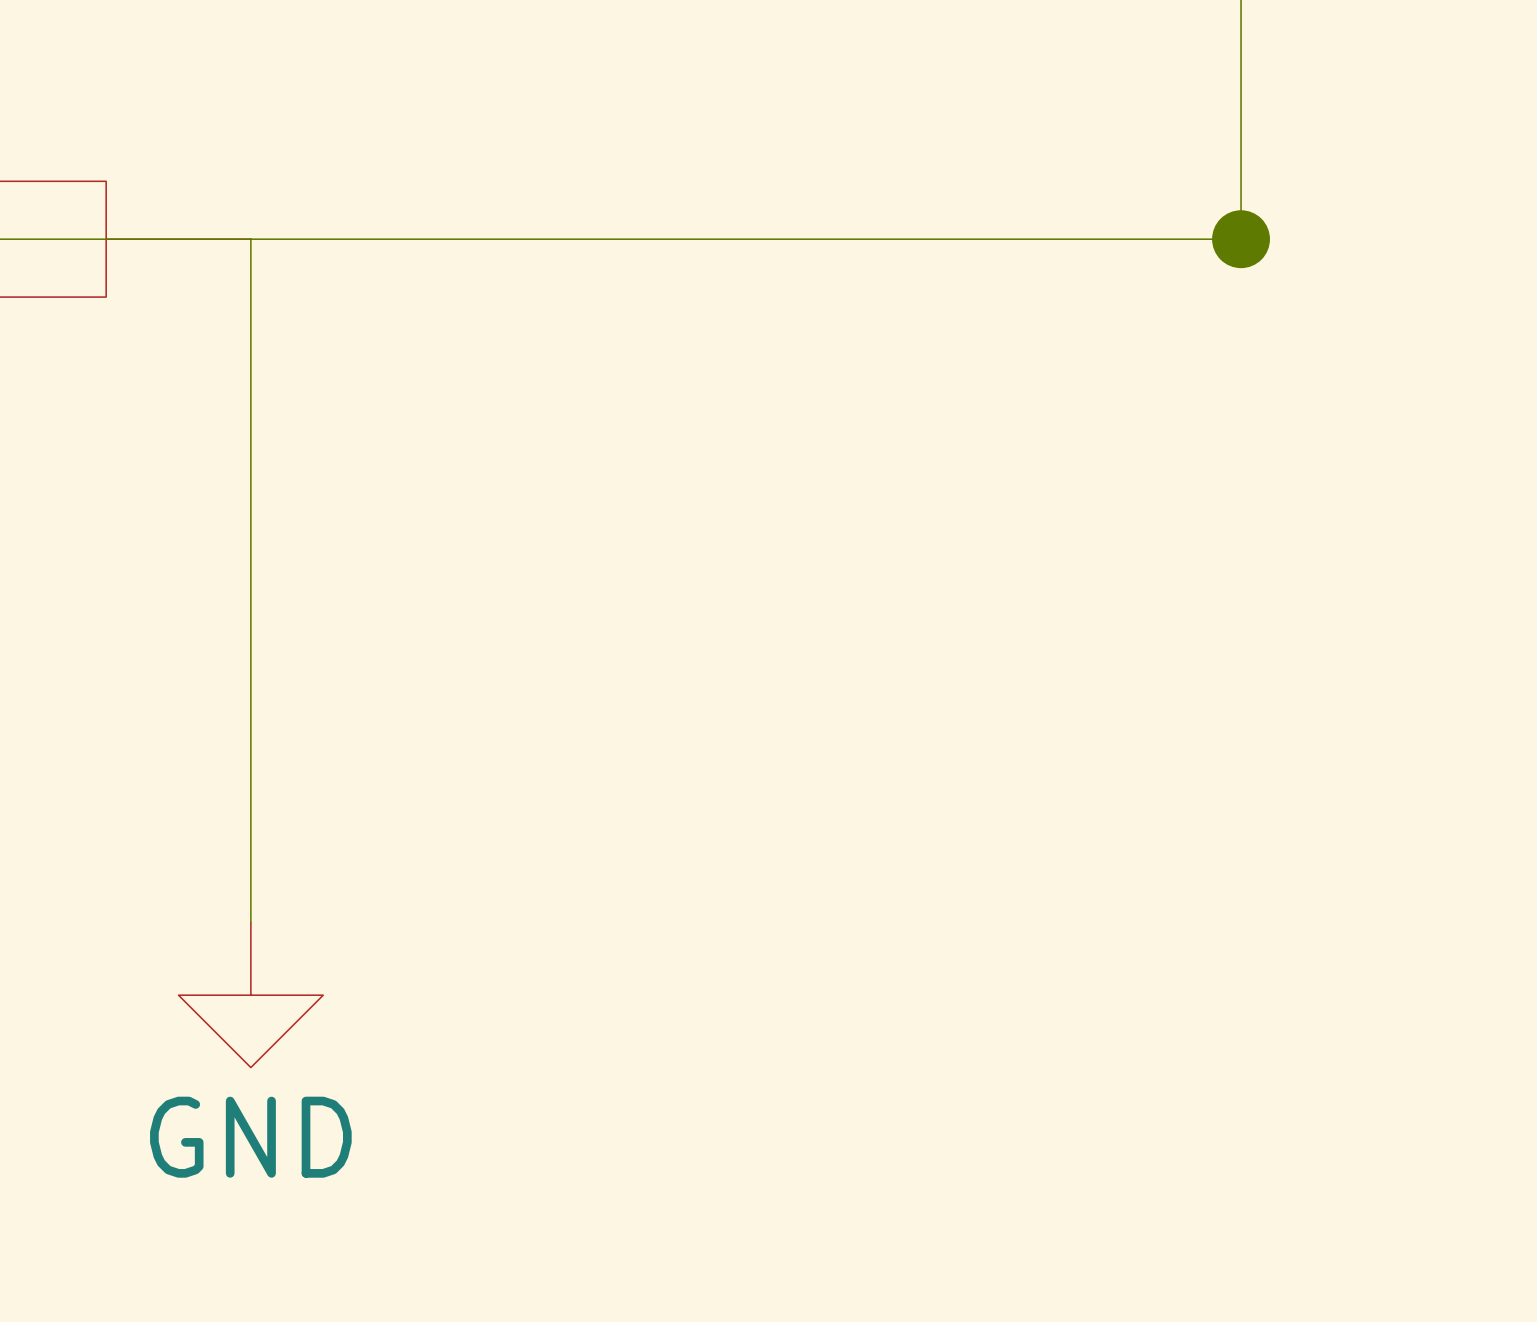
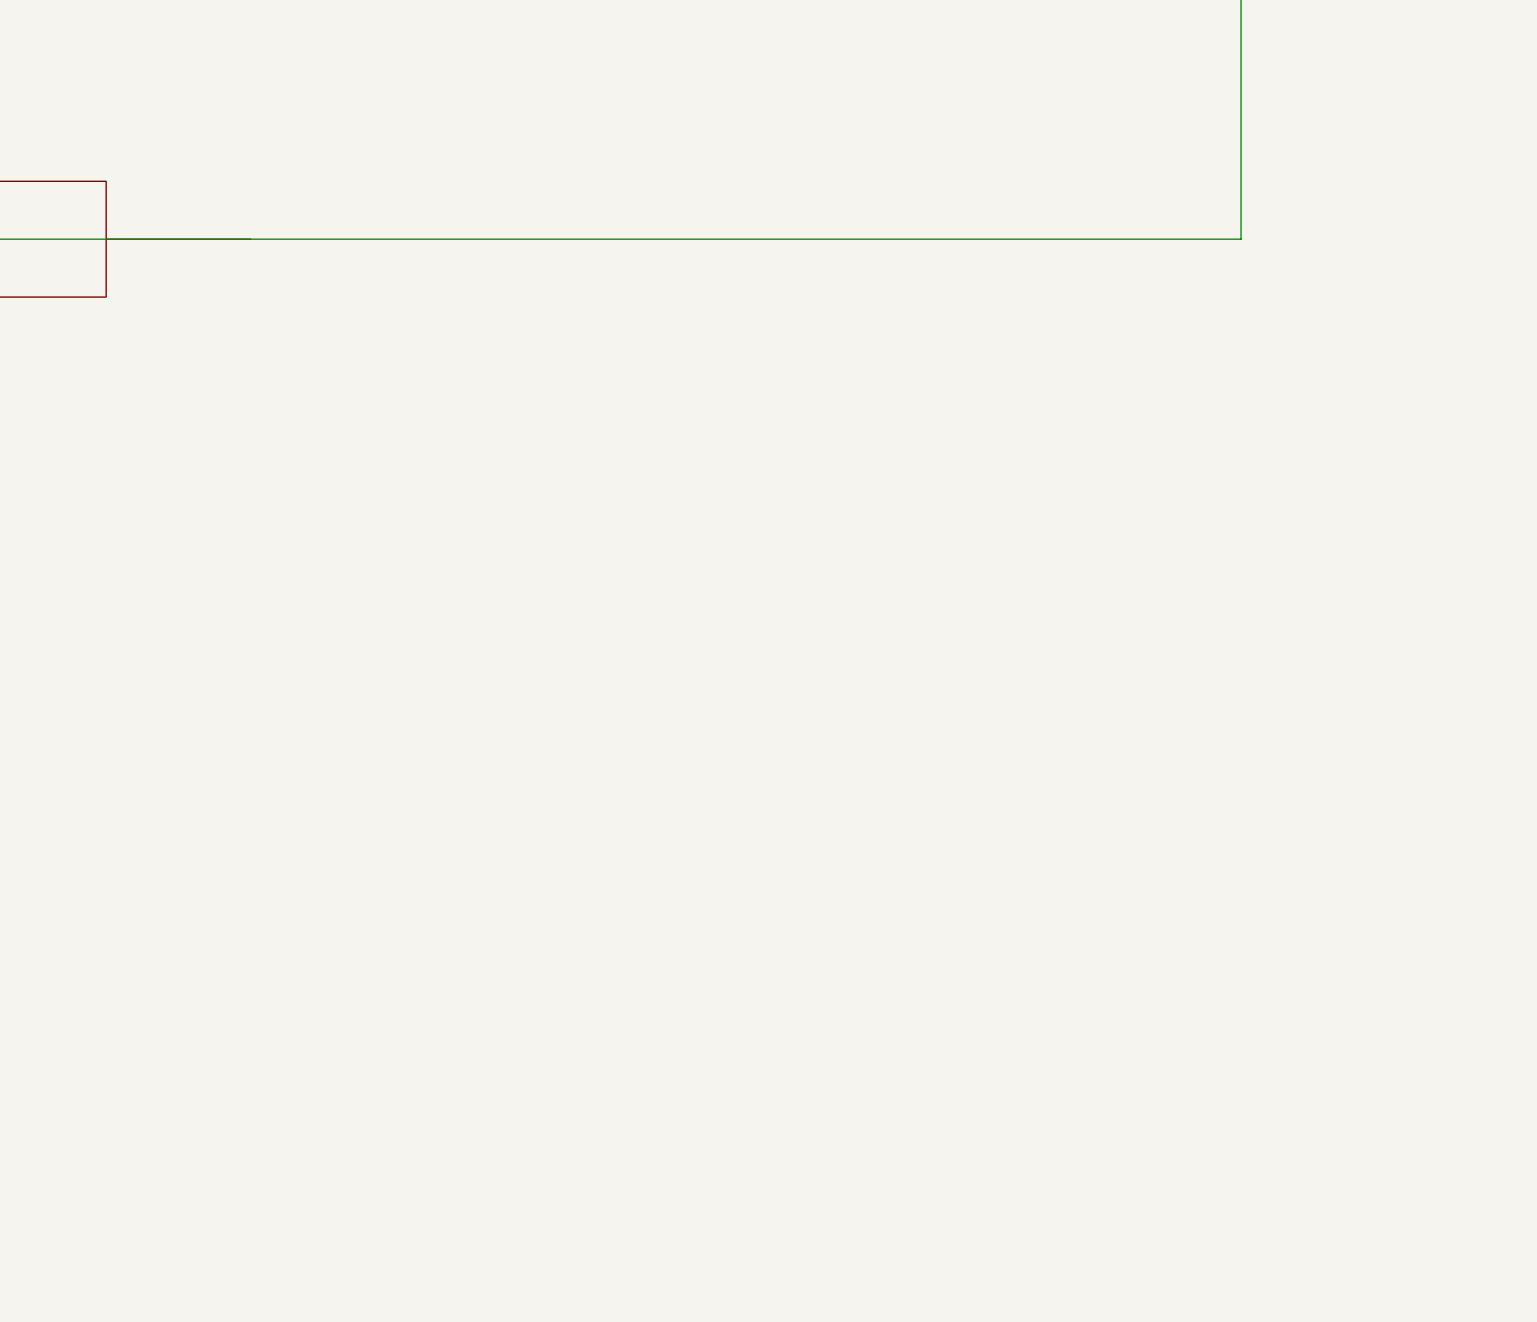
wire: (250, 239) (250, 922) -> none
junction: (1241, 239) -> none
power symbol: GND (250, 995) -> none

